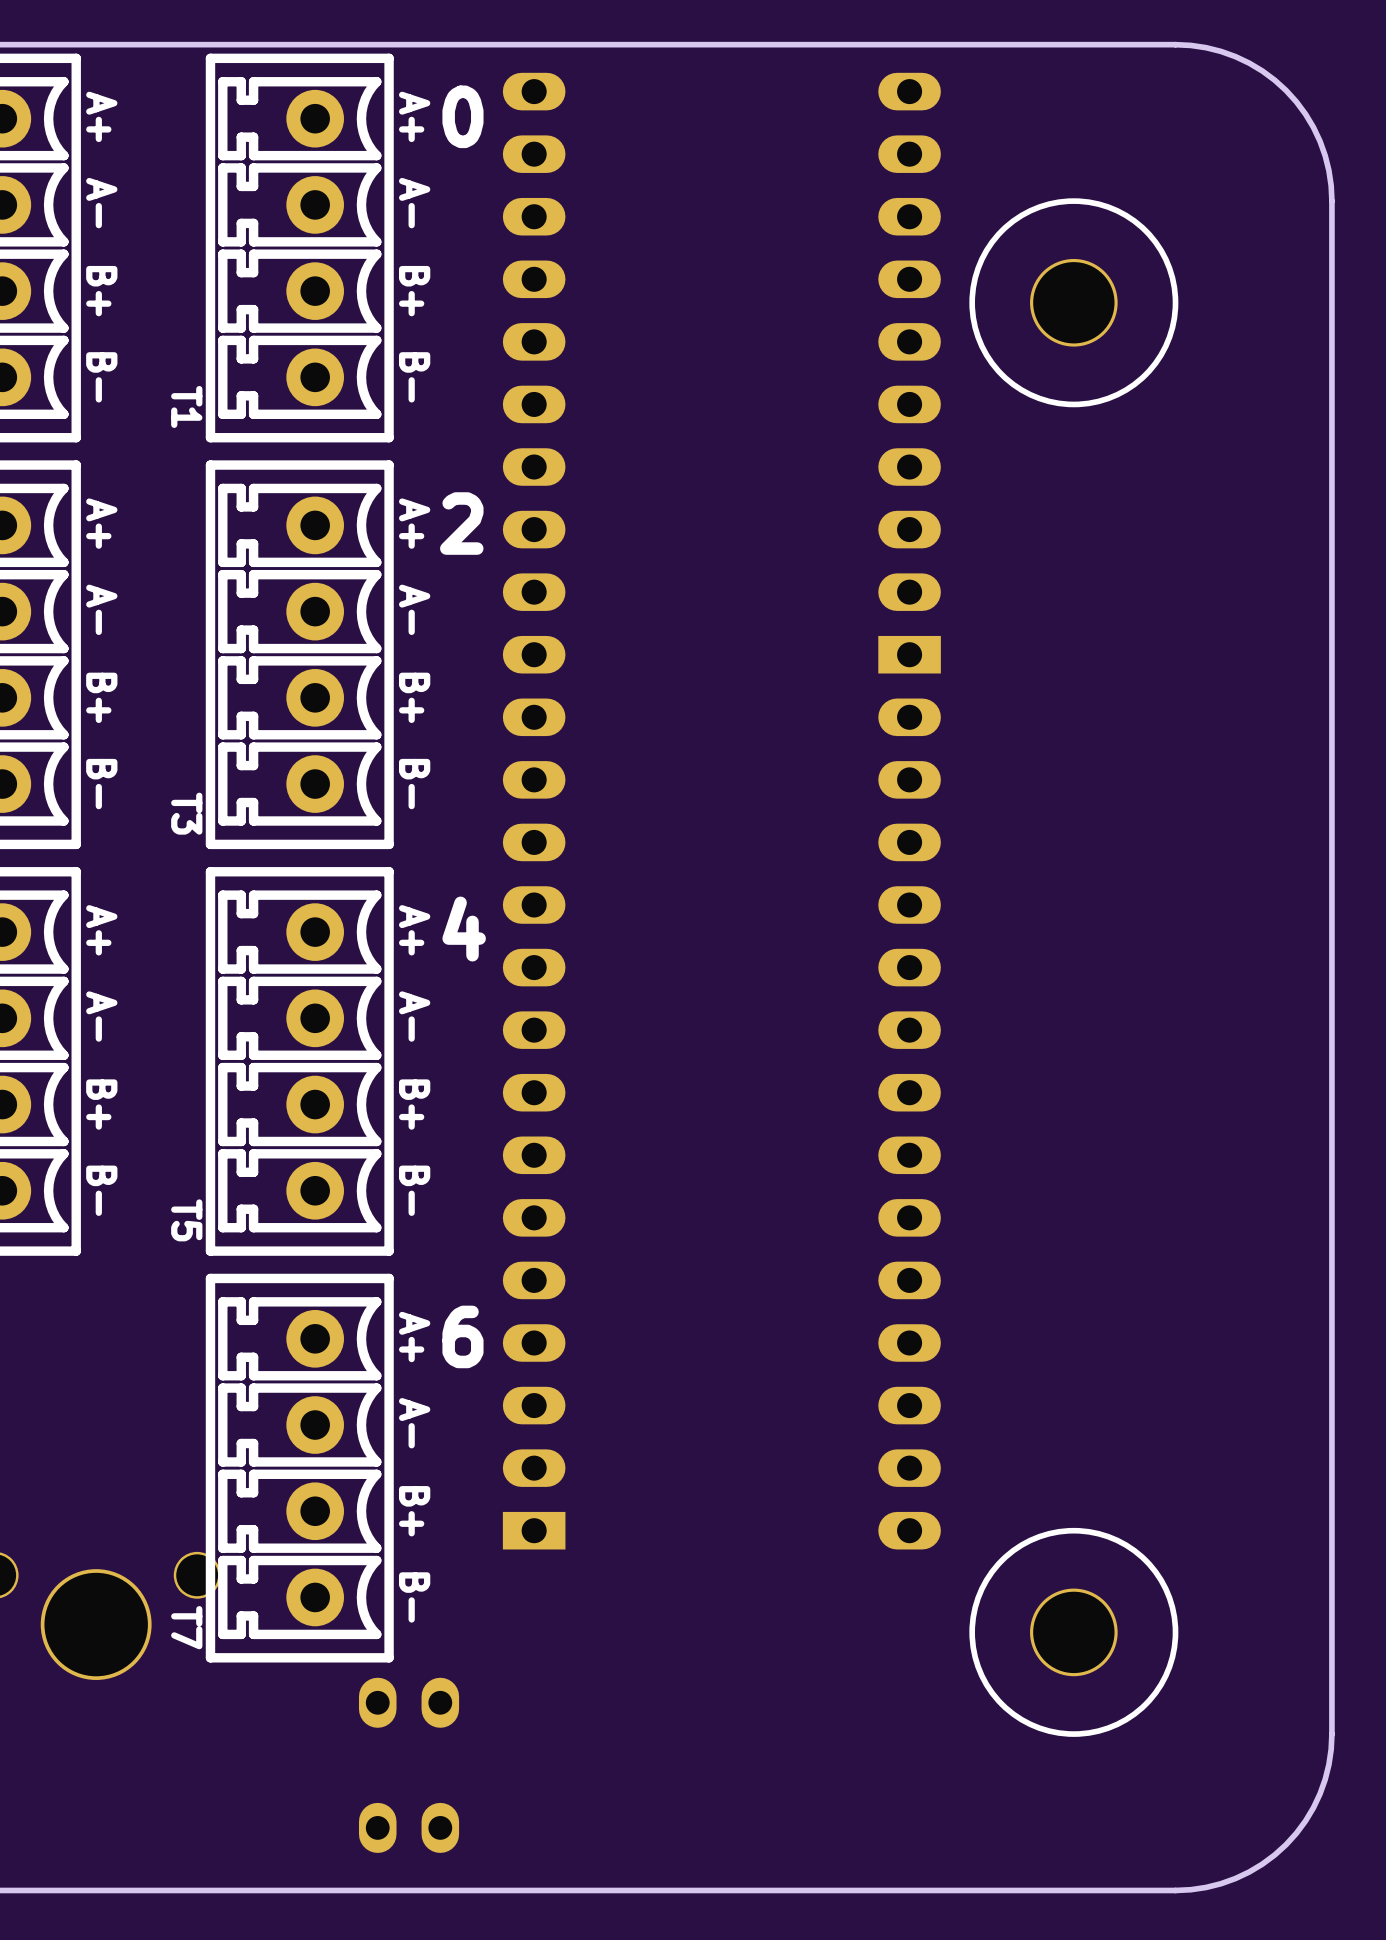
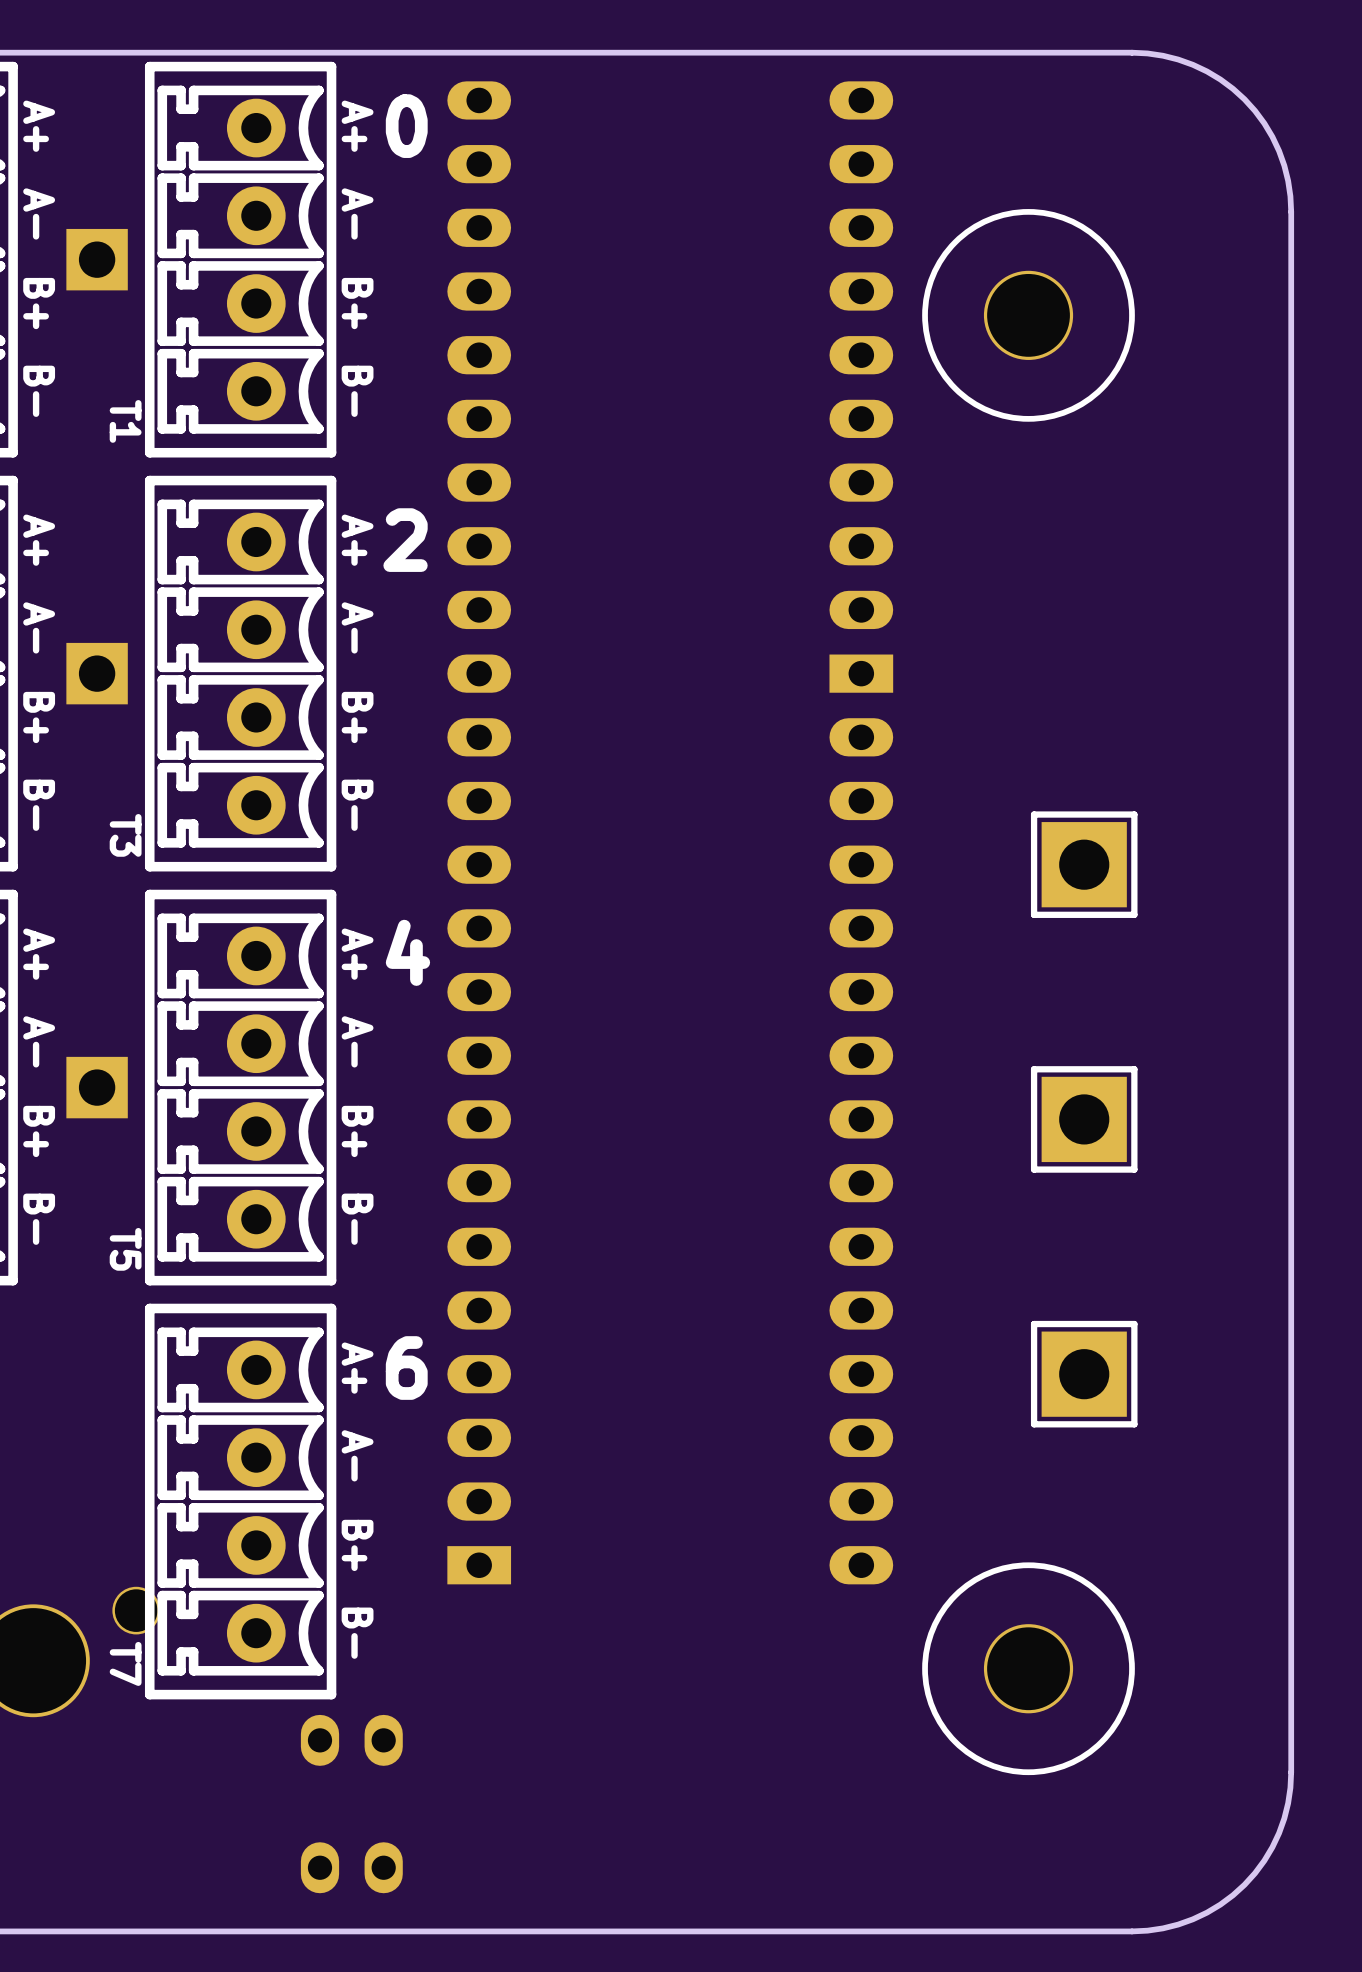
part: none -> (97, 259)
part: none -> (97, 673)
part: none -> (1084, 864)
part: none -> (97, 1087)
part: none -> (1084, 1119)
part: none -> (1084, 1374)

